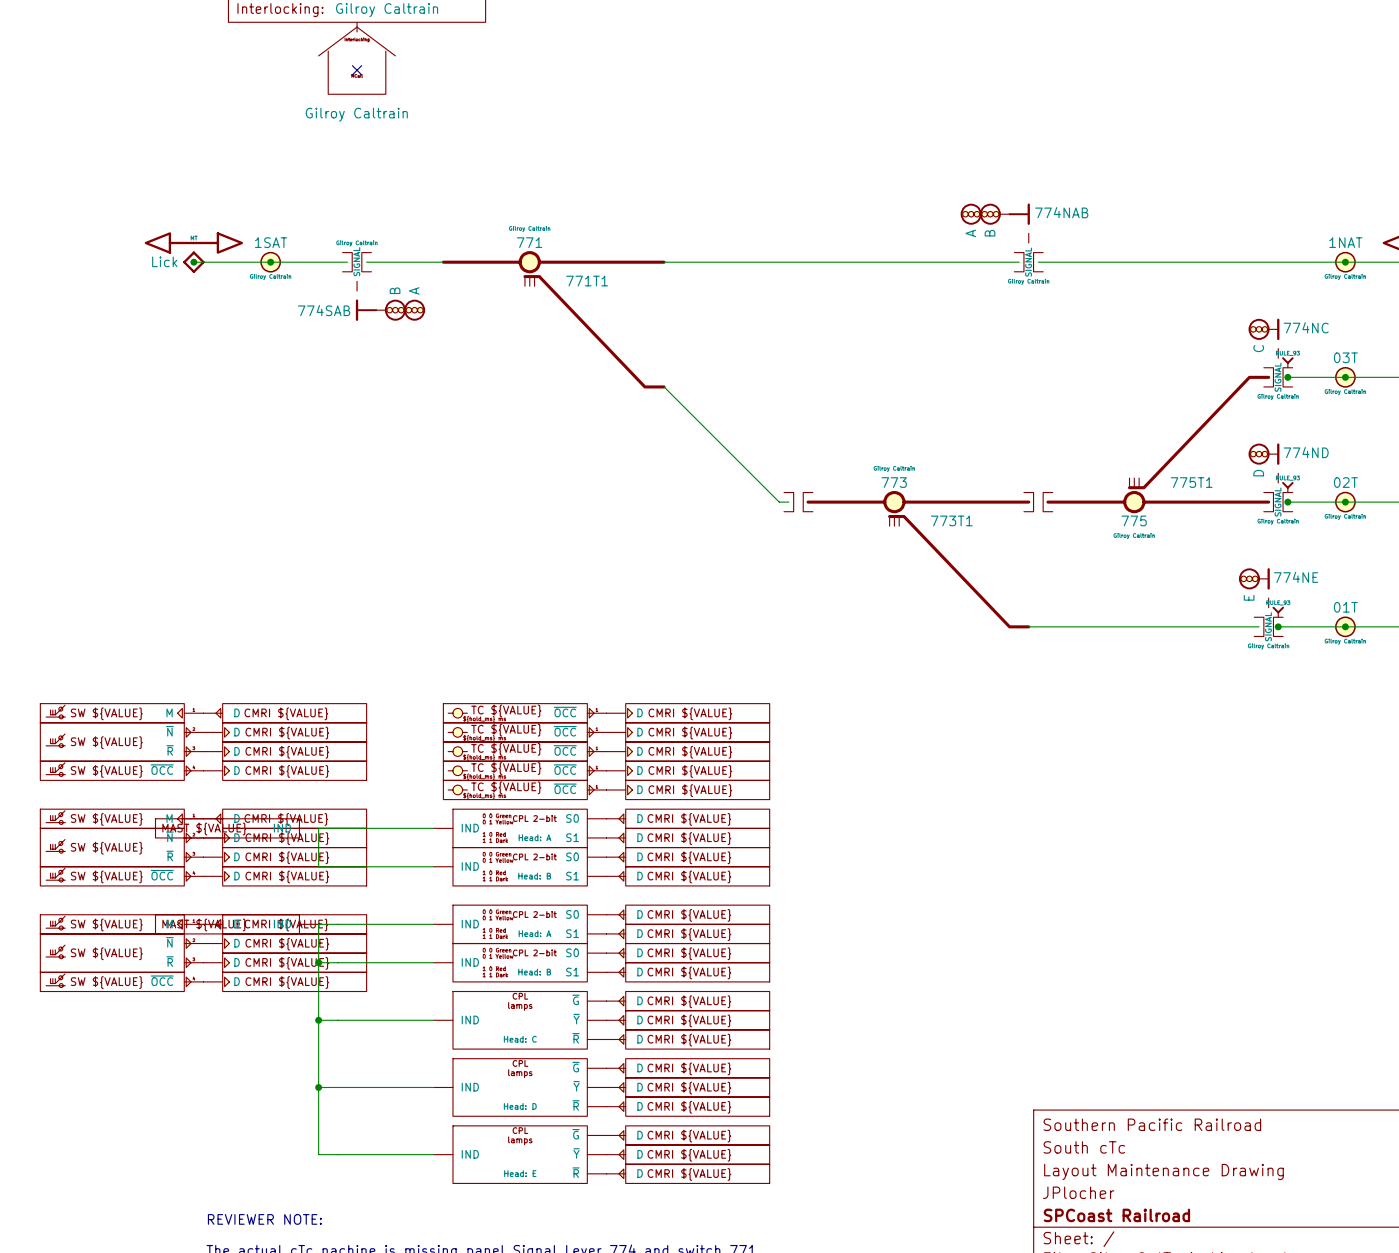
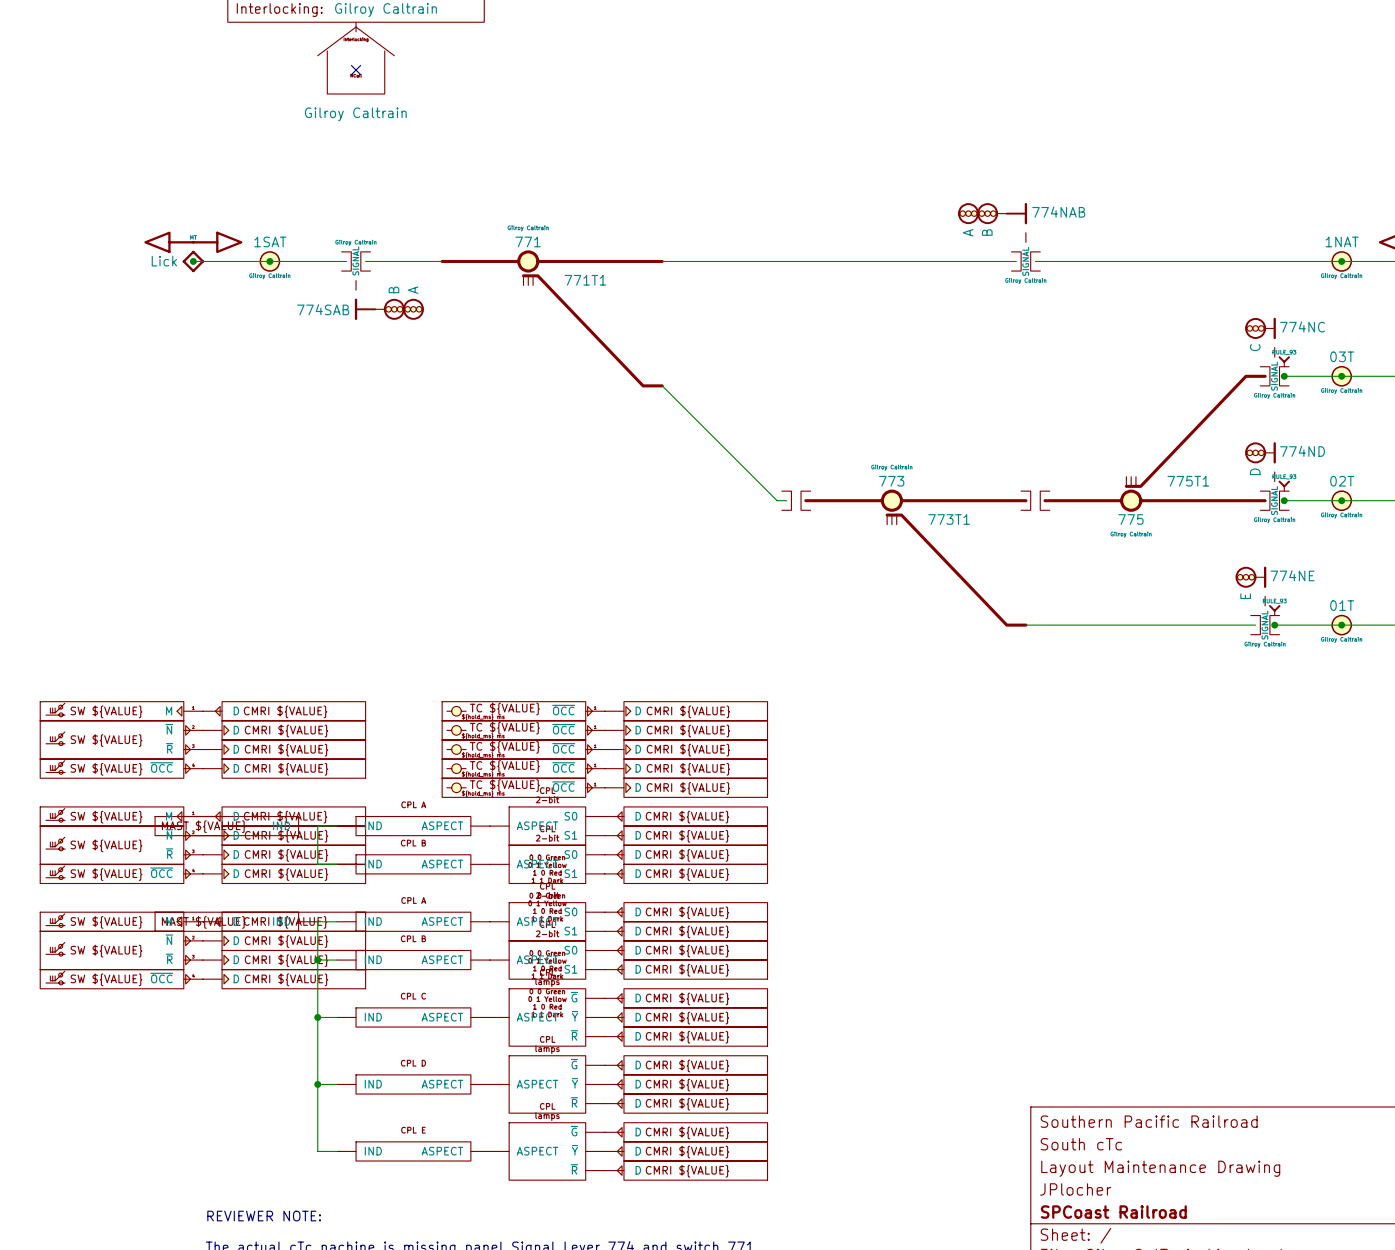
wire: (337, 828) (433, 828) -> none
part: none -> (413, 826)
part: (520, 828) -> none
part: none -> (547, 826)
wire: (337, 866) (433, 866) -> none
part: none -> (413, 864)
part: (520, 866) -> none
part: none -> (547, 864)
wire: (337, 924) (433, 924) -> none
part: none -> (413, 921)
part: (520, 924) -> none
part: none -> (547, 921)
wire: (337, 962) (433, 962) -> none
part: none -> (413, 960)
part: (520, 962) -> none
part: none -> (547, 960)
wire: (337, 1020) (433, 1020) -> none
part: none -> (413, 1017)
part: (520, 1020) -> none
part: none -> (547, 1017)
wire: (337, 1087) (433, 1087) -> none
part: none -> (413, 1084)
part: (520, 1087) -> none
part: none -> (547, 1084)
wire: (337, 1154) (433, 1154) -> none
part: none -> (413, 1151)
part: (520, 1154) -> none
part: none -> (547, 1151)

